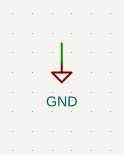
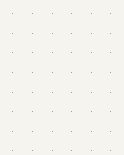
wire: (61, 43) (61, 62) -> none
power symbol: GND (61, 72) -> none

